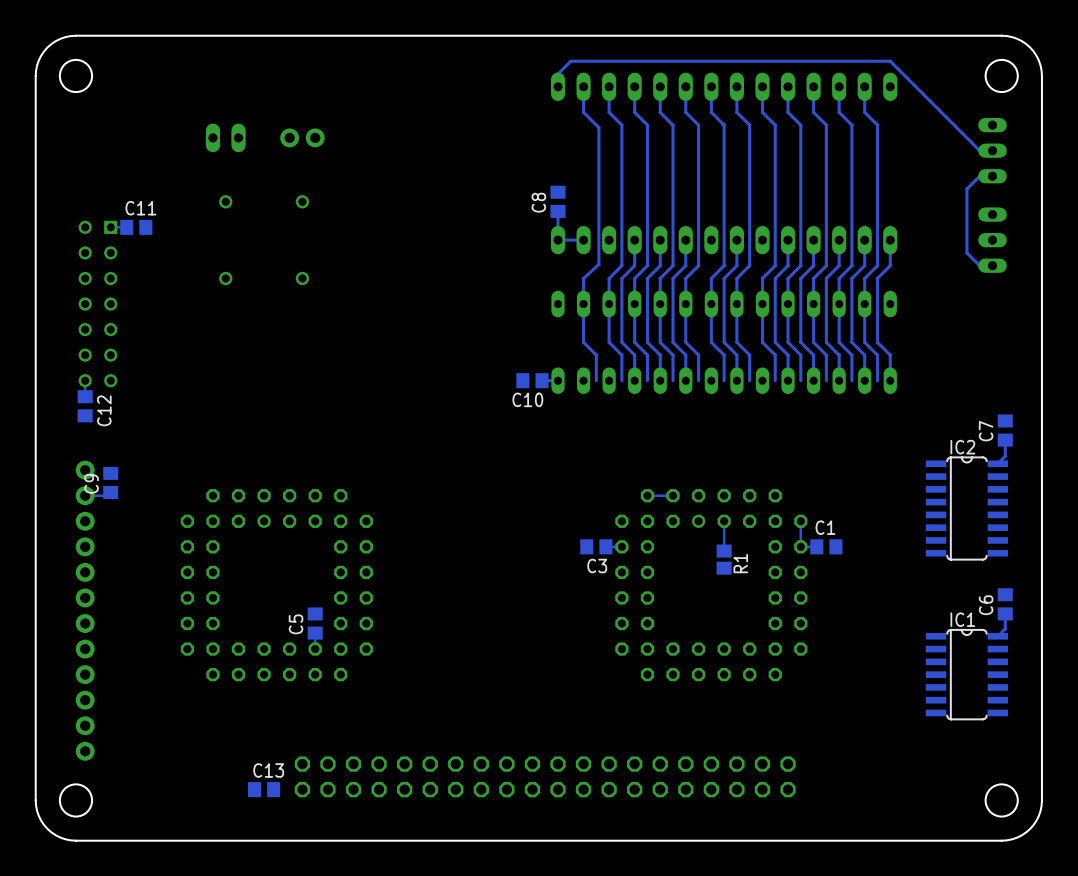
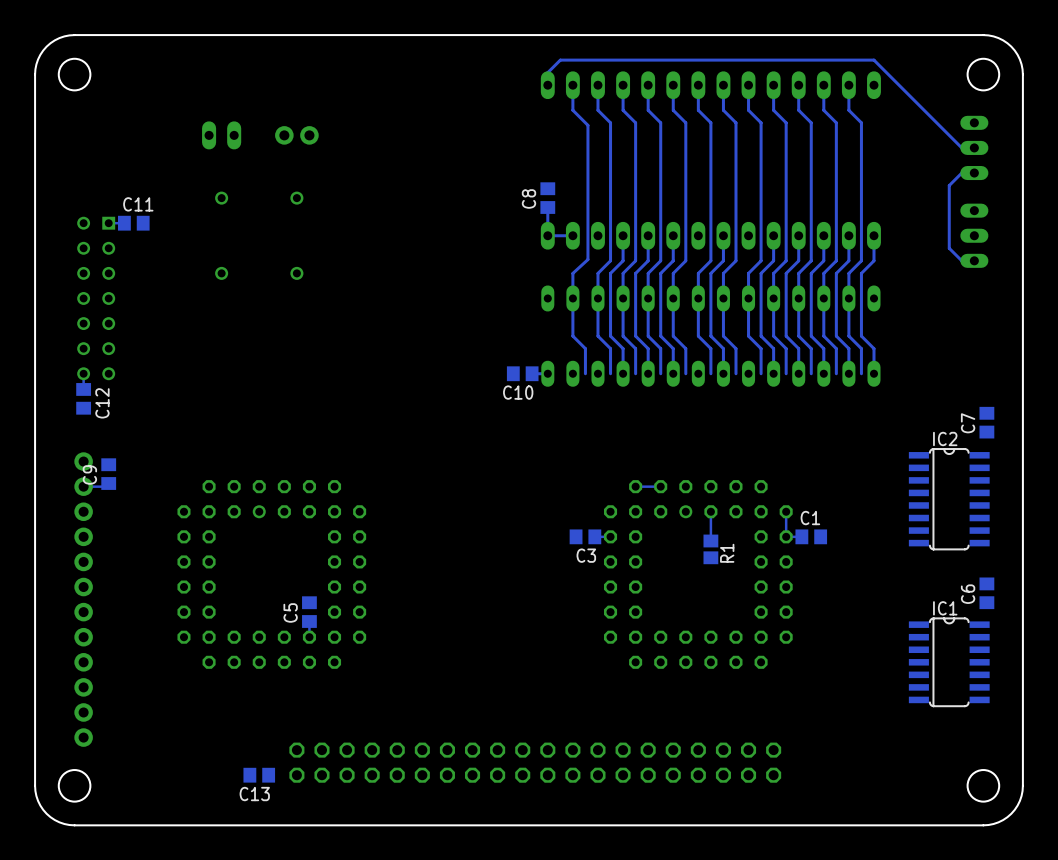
track: (1005, 440) (1005, 456) (997, 463) -> none
track: (1005, 613) (1005, 628) (997, 636) -> none
C13 name position: C13 (268, 770) -> C13 (254, 794)

